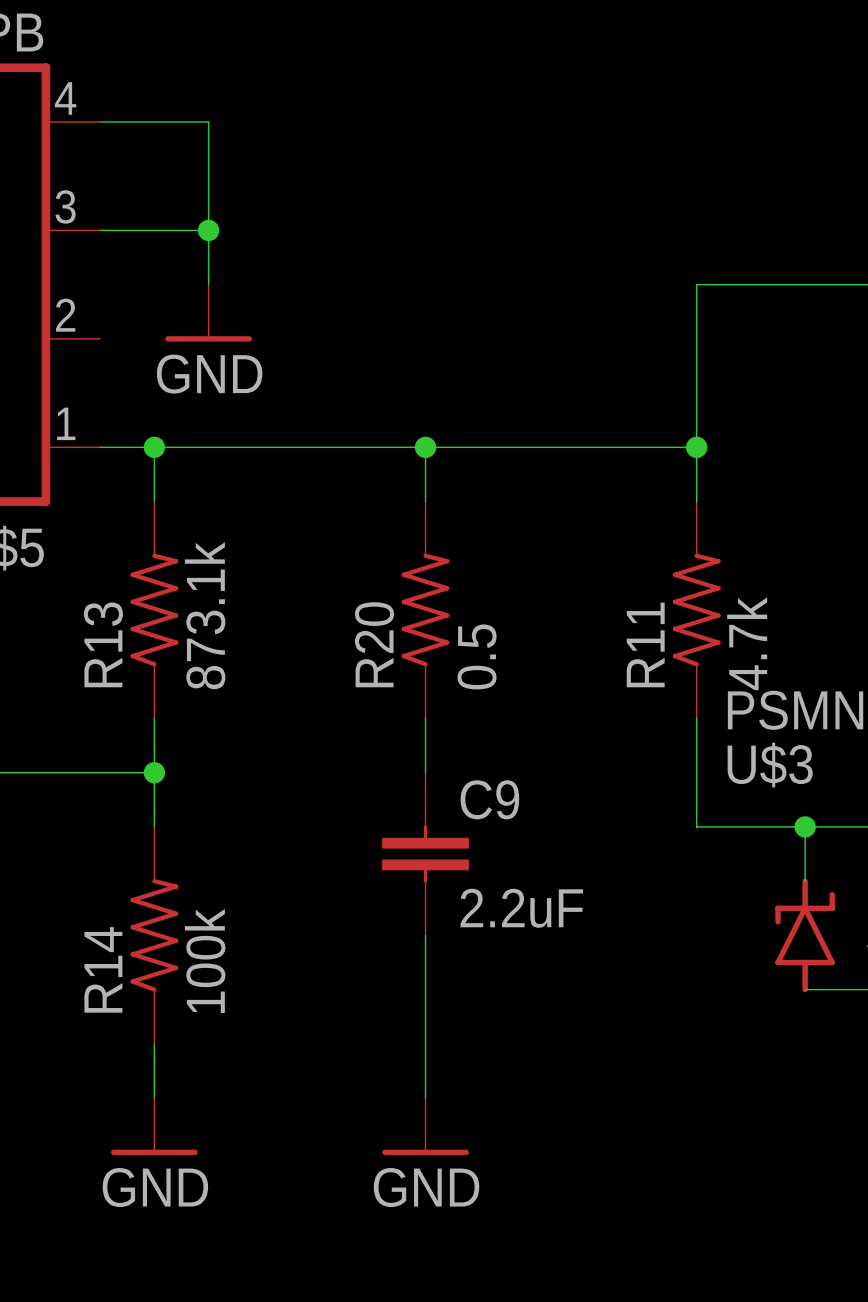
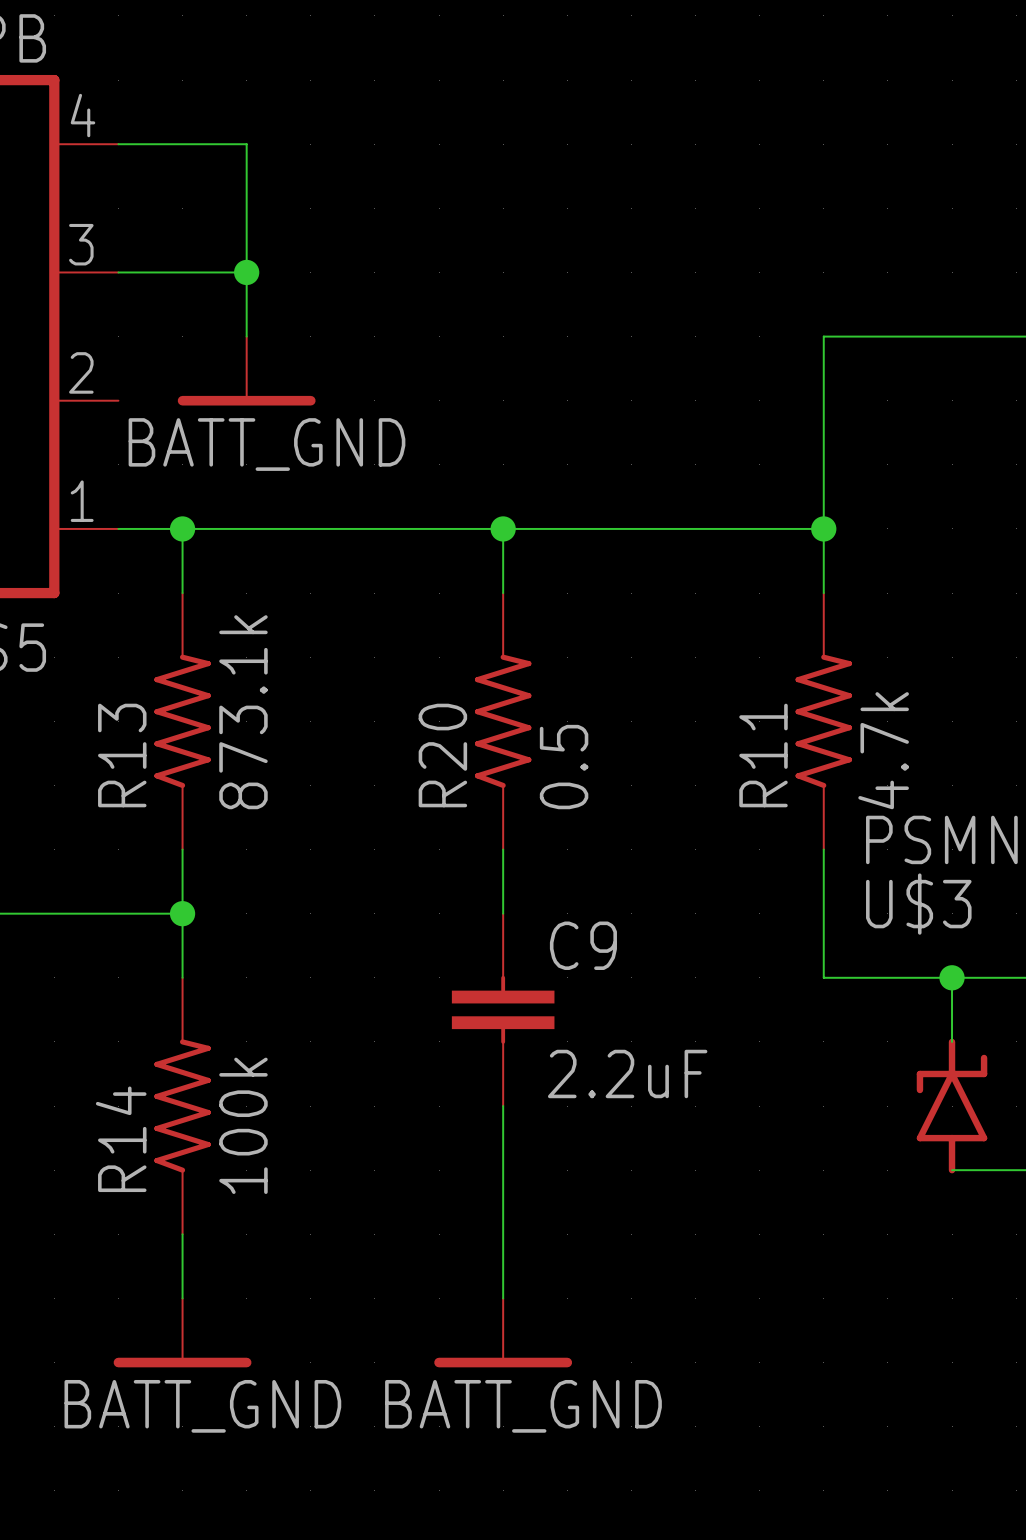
power symbol: GND (208, 313) -> BATT_GND (246, 371)
power symbol: GND (154, 1126) -> BATT_GND (182, 1332)
power symbol: GND (425, 1126) -> BATT_GND (503, 1332)

